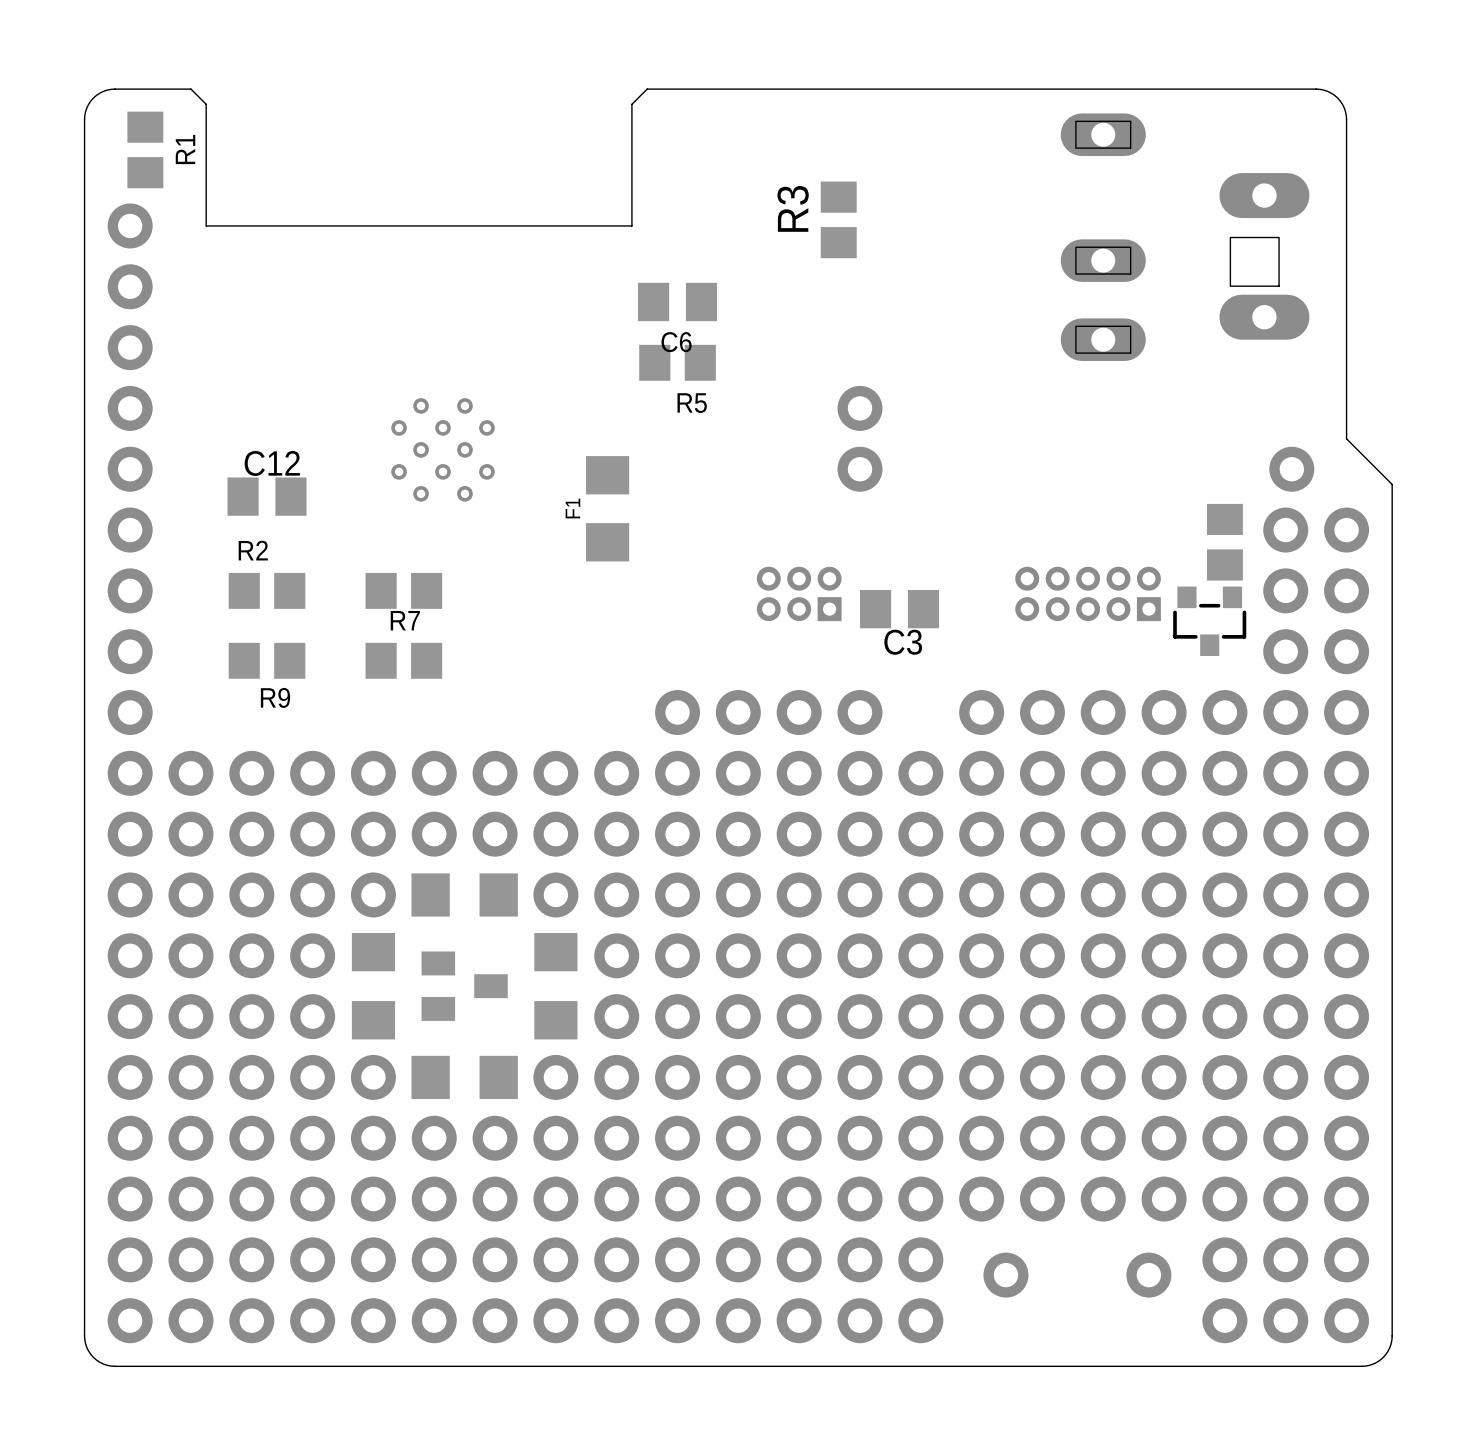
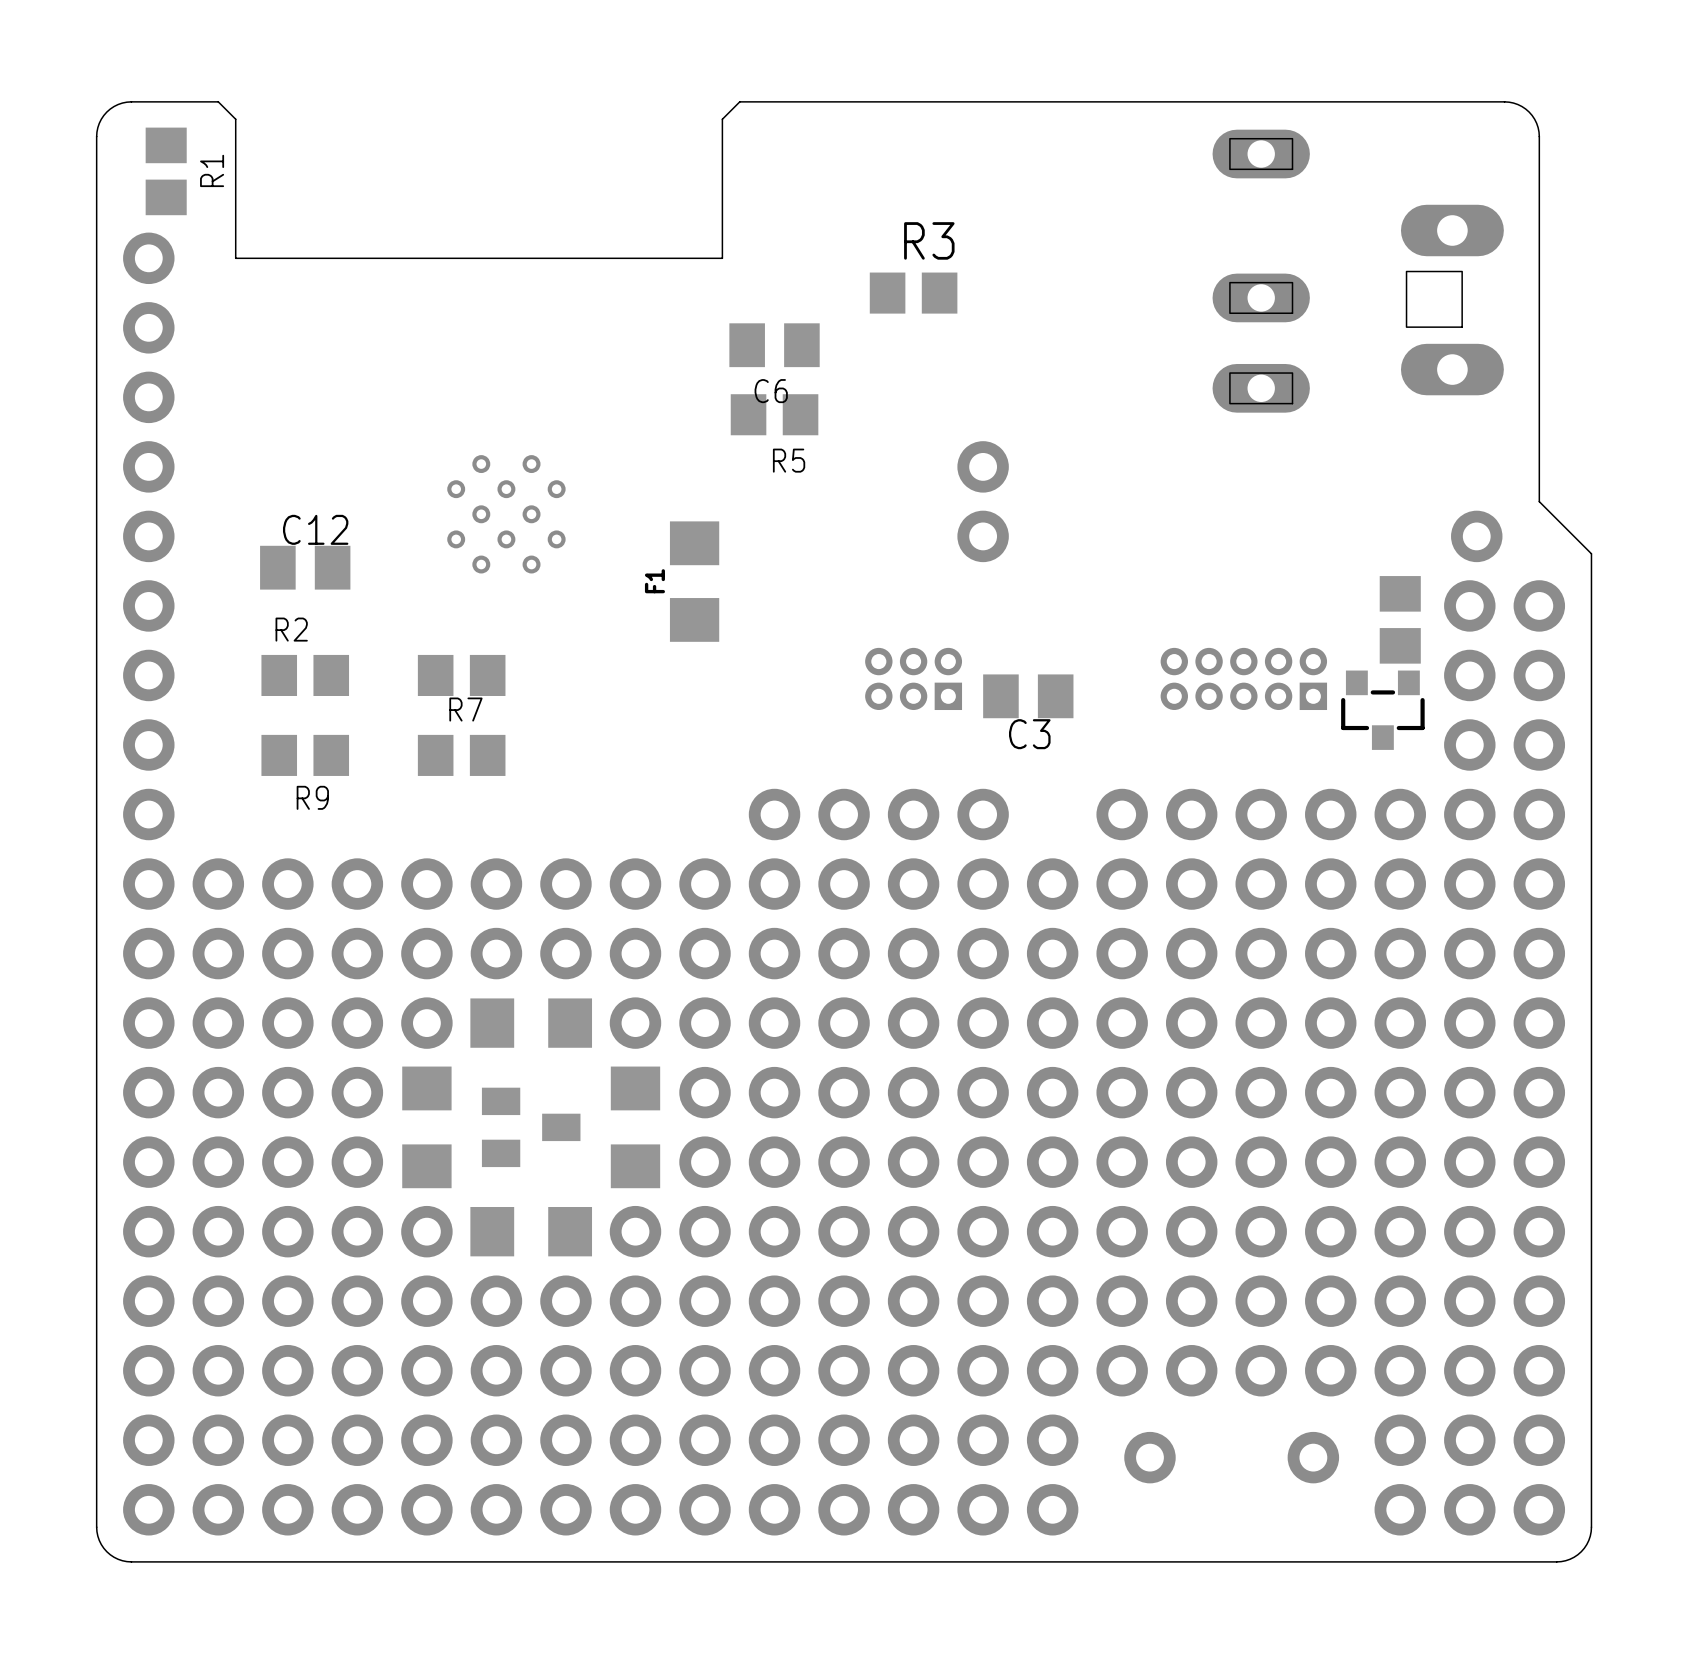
part footprint: [1219, 173, 1310, 219] -> [1400, 204, 1504, 257]
R3 rotation: 0° (838, 219) -> 90° clockwise (913, 293)
R3 position: (838, 219) -> (913, 293)
part footprint: [1219, 294, 1310, 340] -> [1400, 343, 1504, 396]

